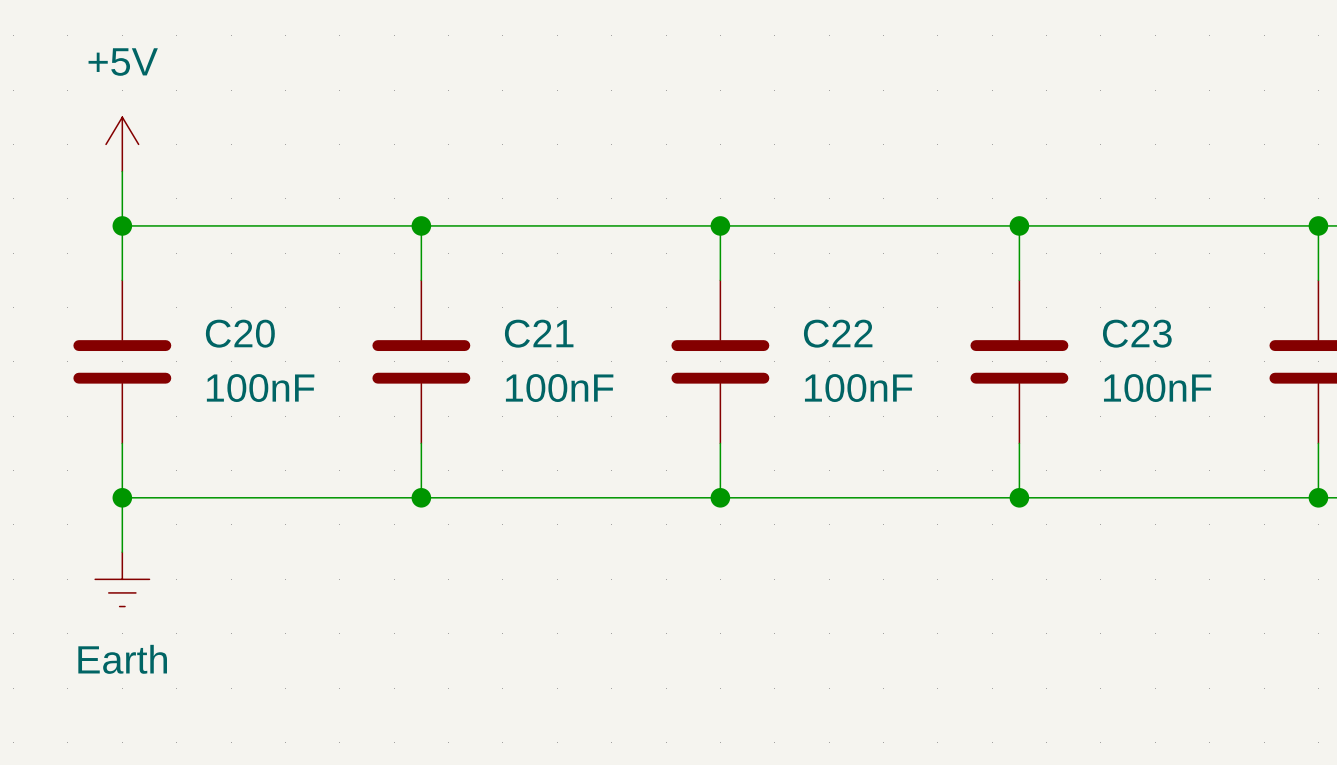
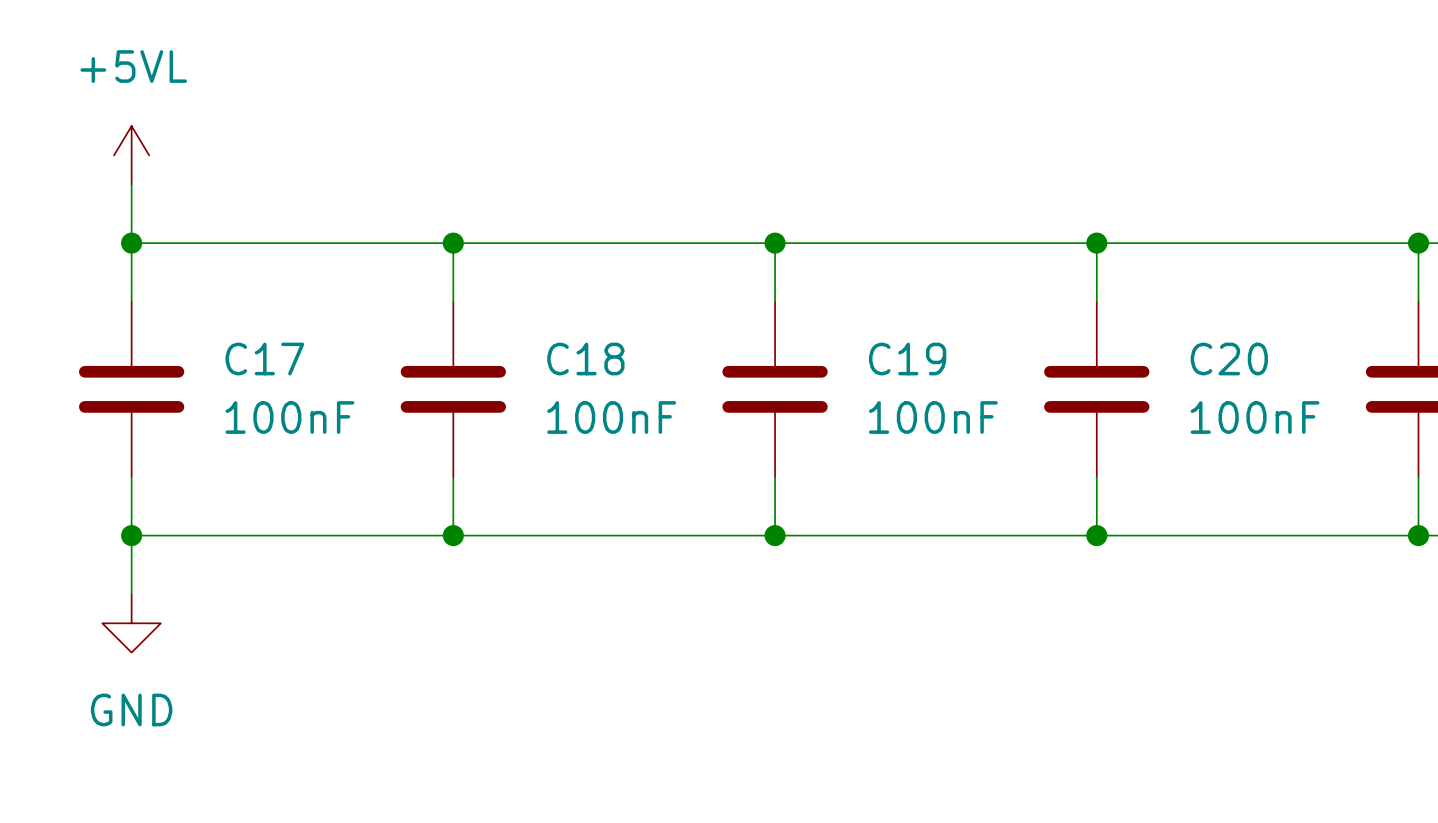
power symbol: +5V (122, 144) -> +5VL (131, 155)
C20 name: C20 (240, 333) -> C17 (264, 359)
C21 name: C21 (539, 333) -> C18 (585, 359)
C22 name: C22 (838, 333) -> C19 (907, 359)
C23 name: C23 (1137, 333) -> C20 (1229, 359)
power symbol: Earth (122, 579) -> GND (131, 623)

